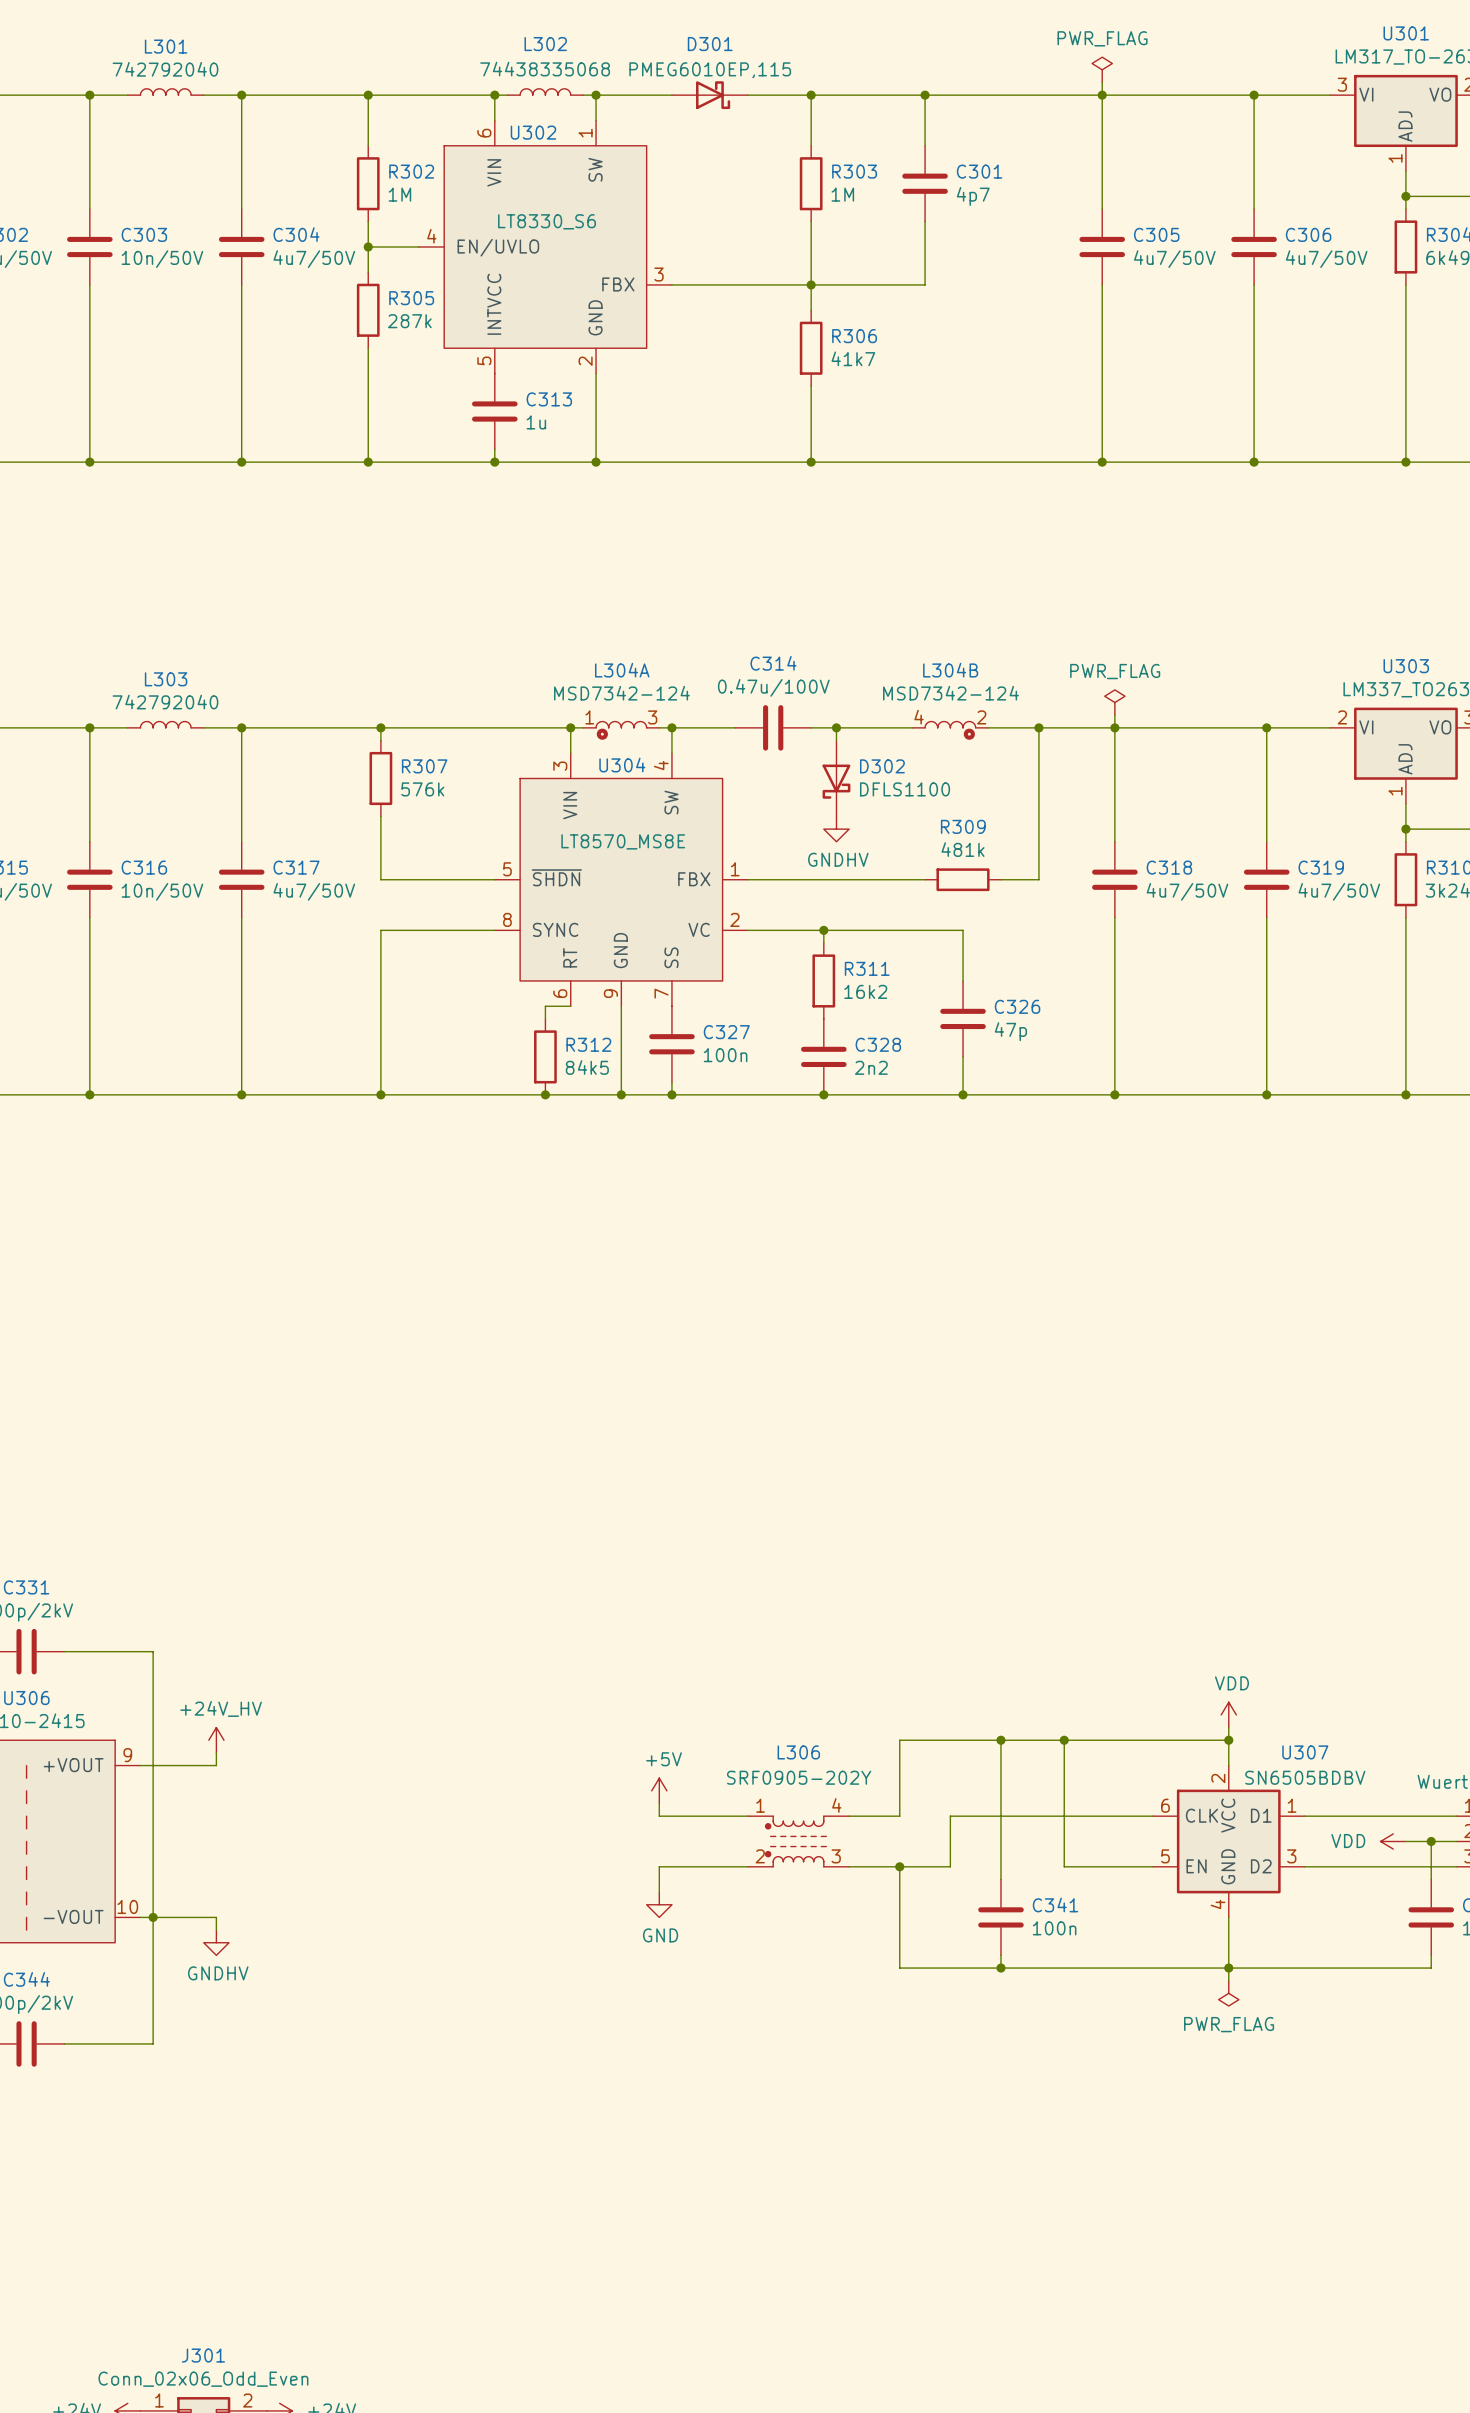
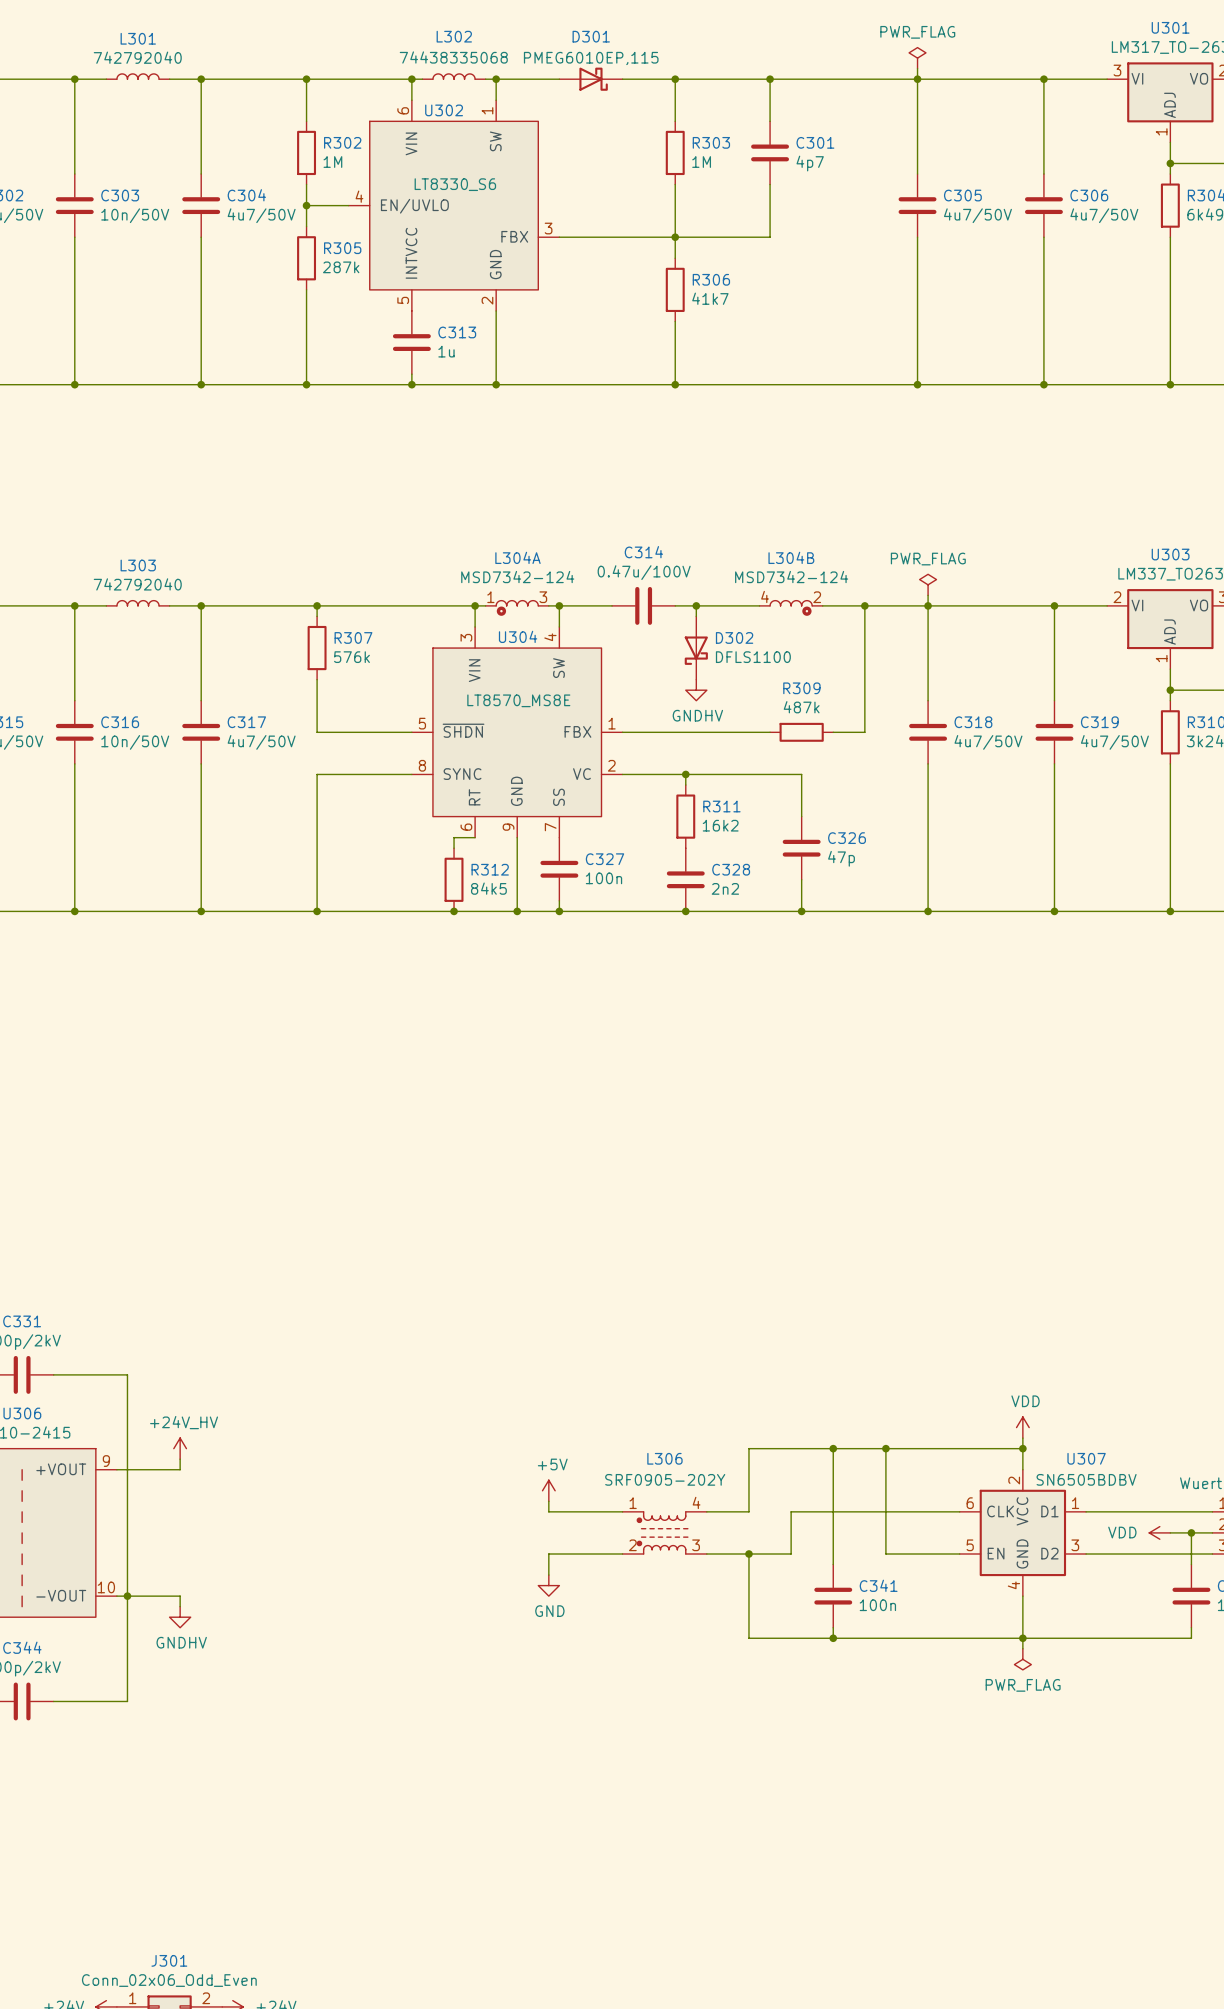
R309 value: 481k (963, 849) -> 487k (801, 707)

